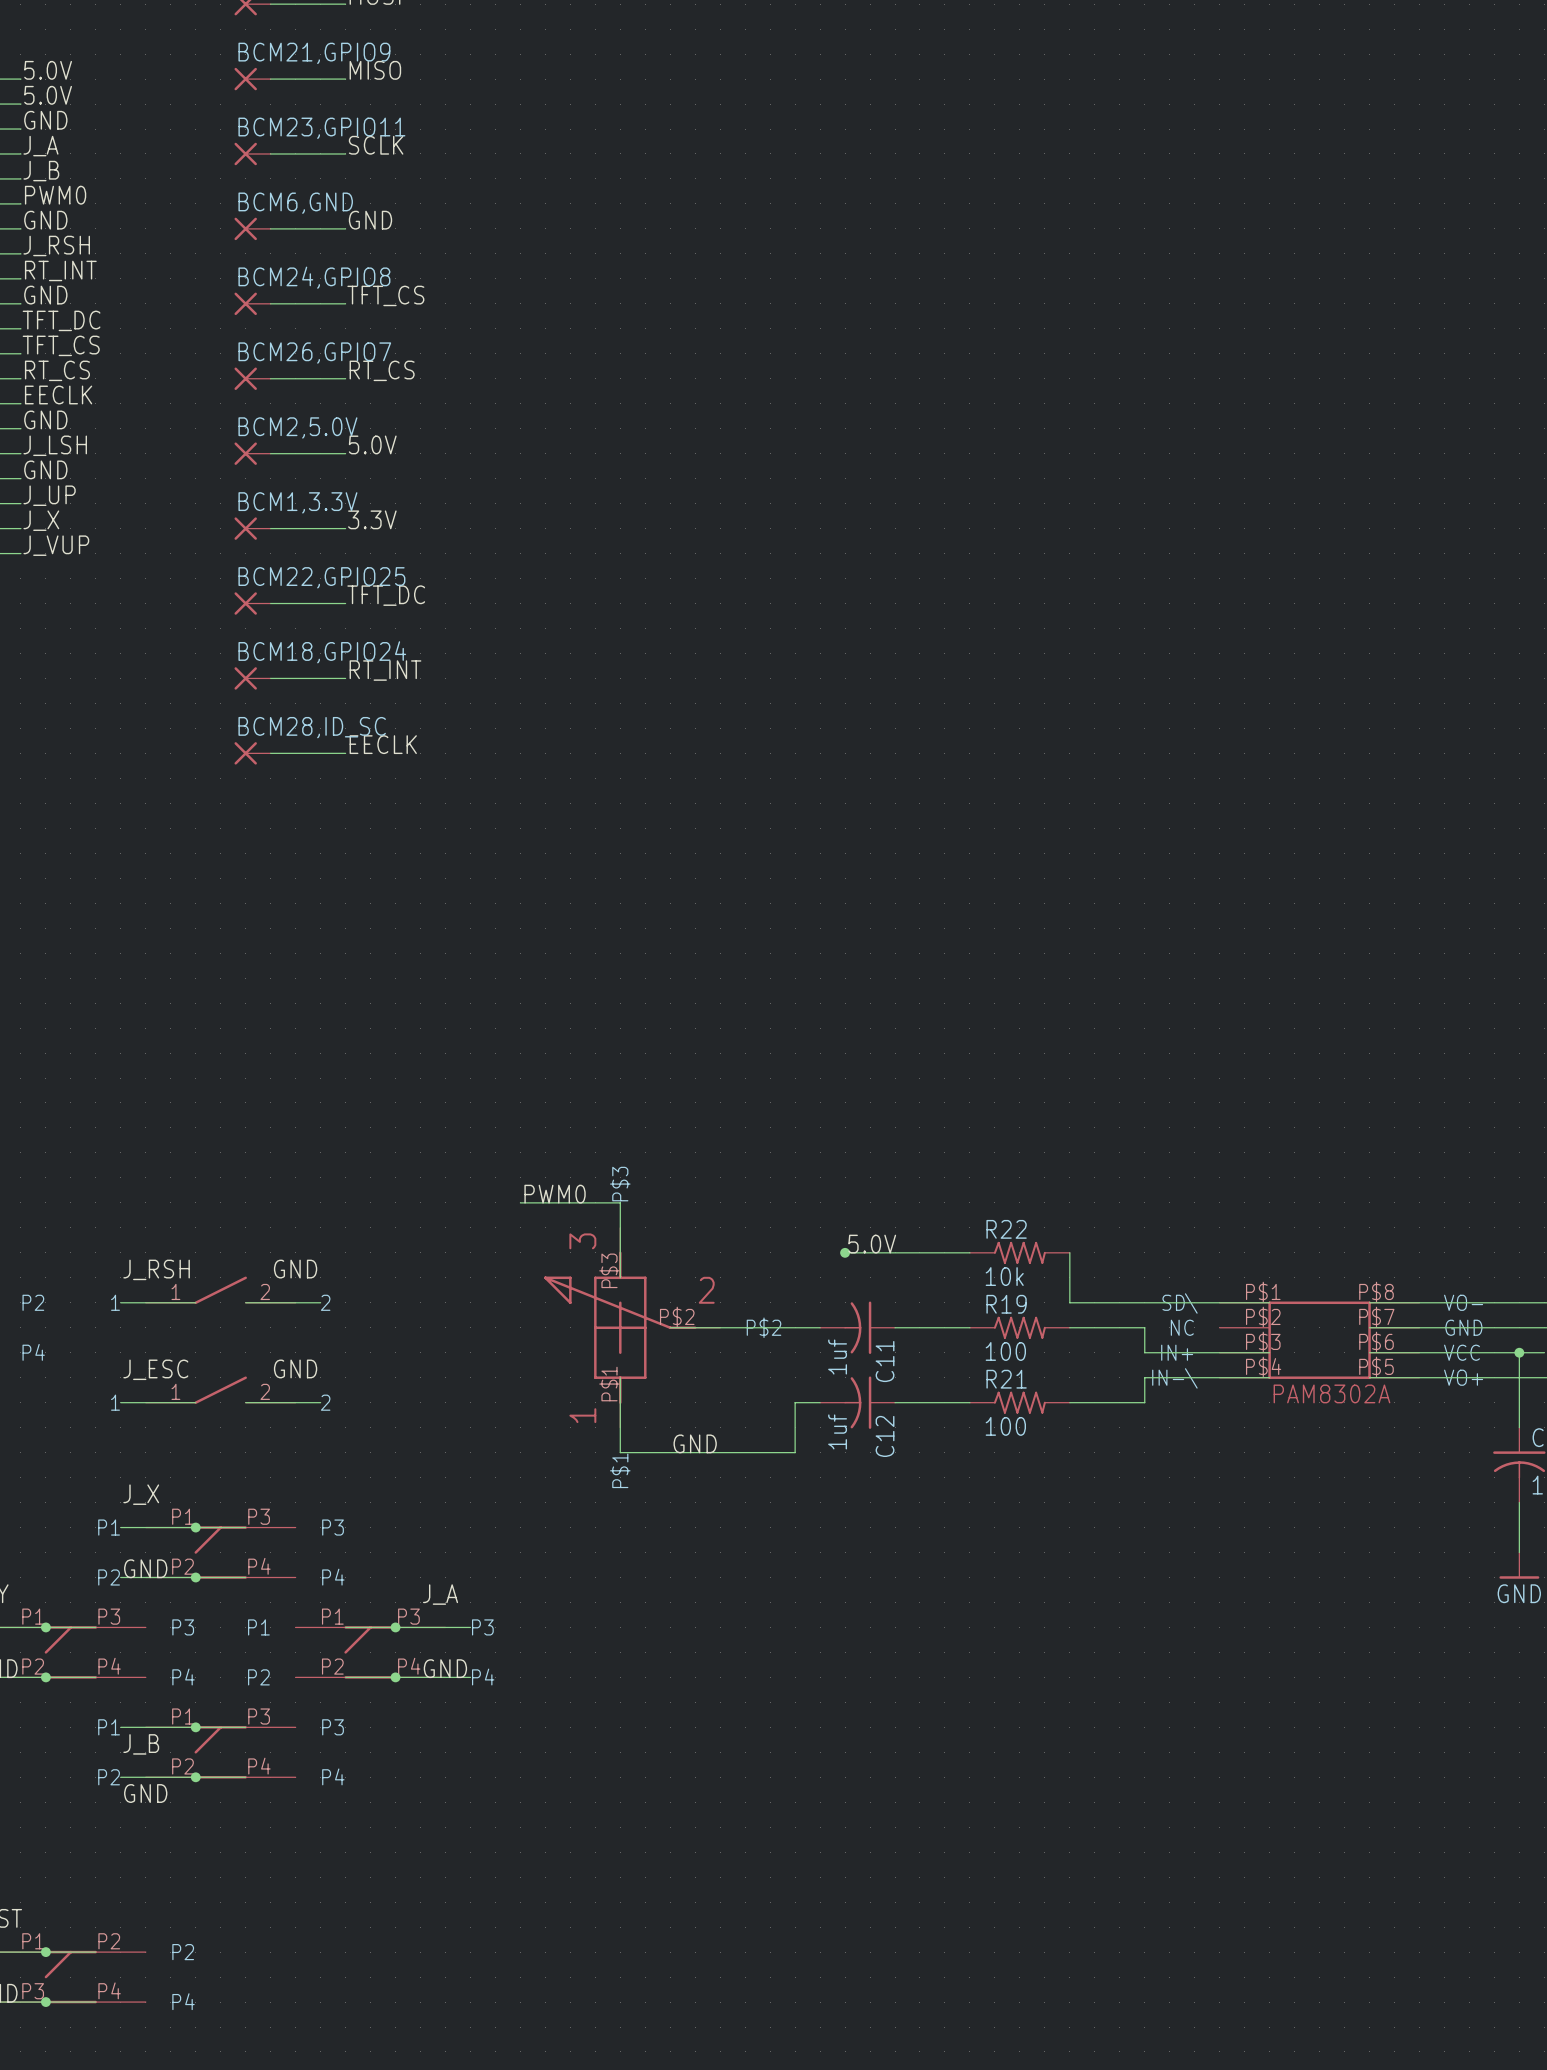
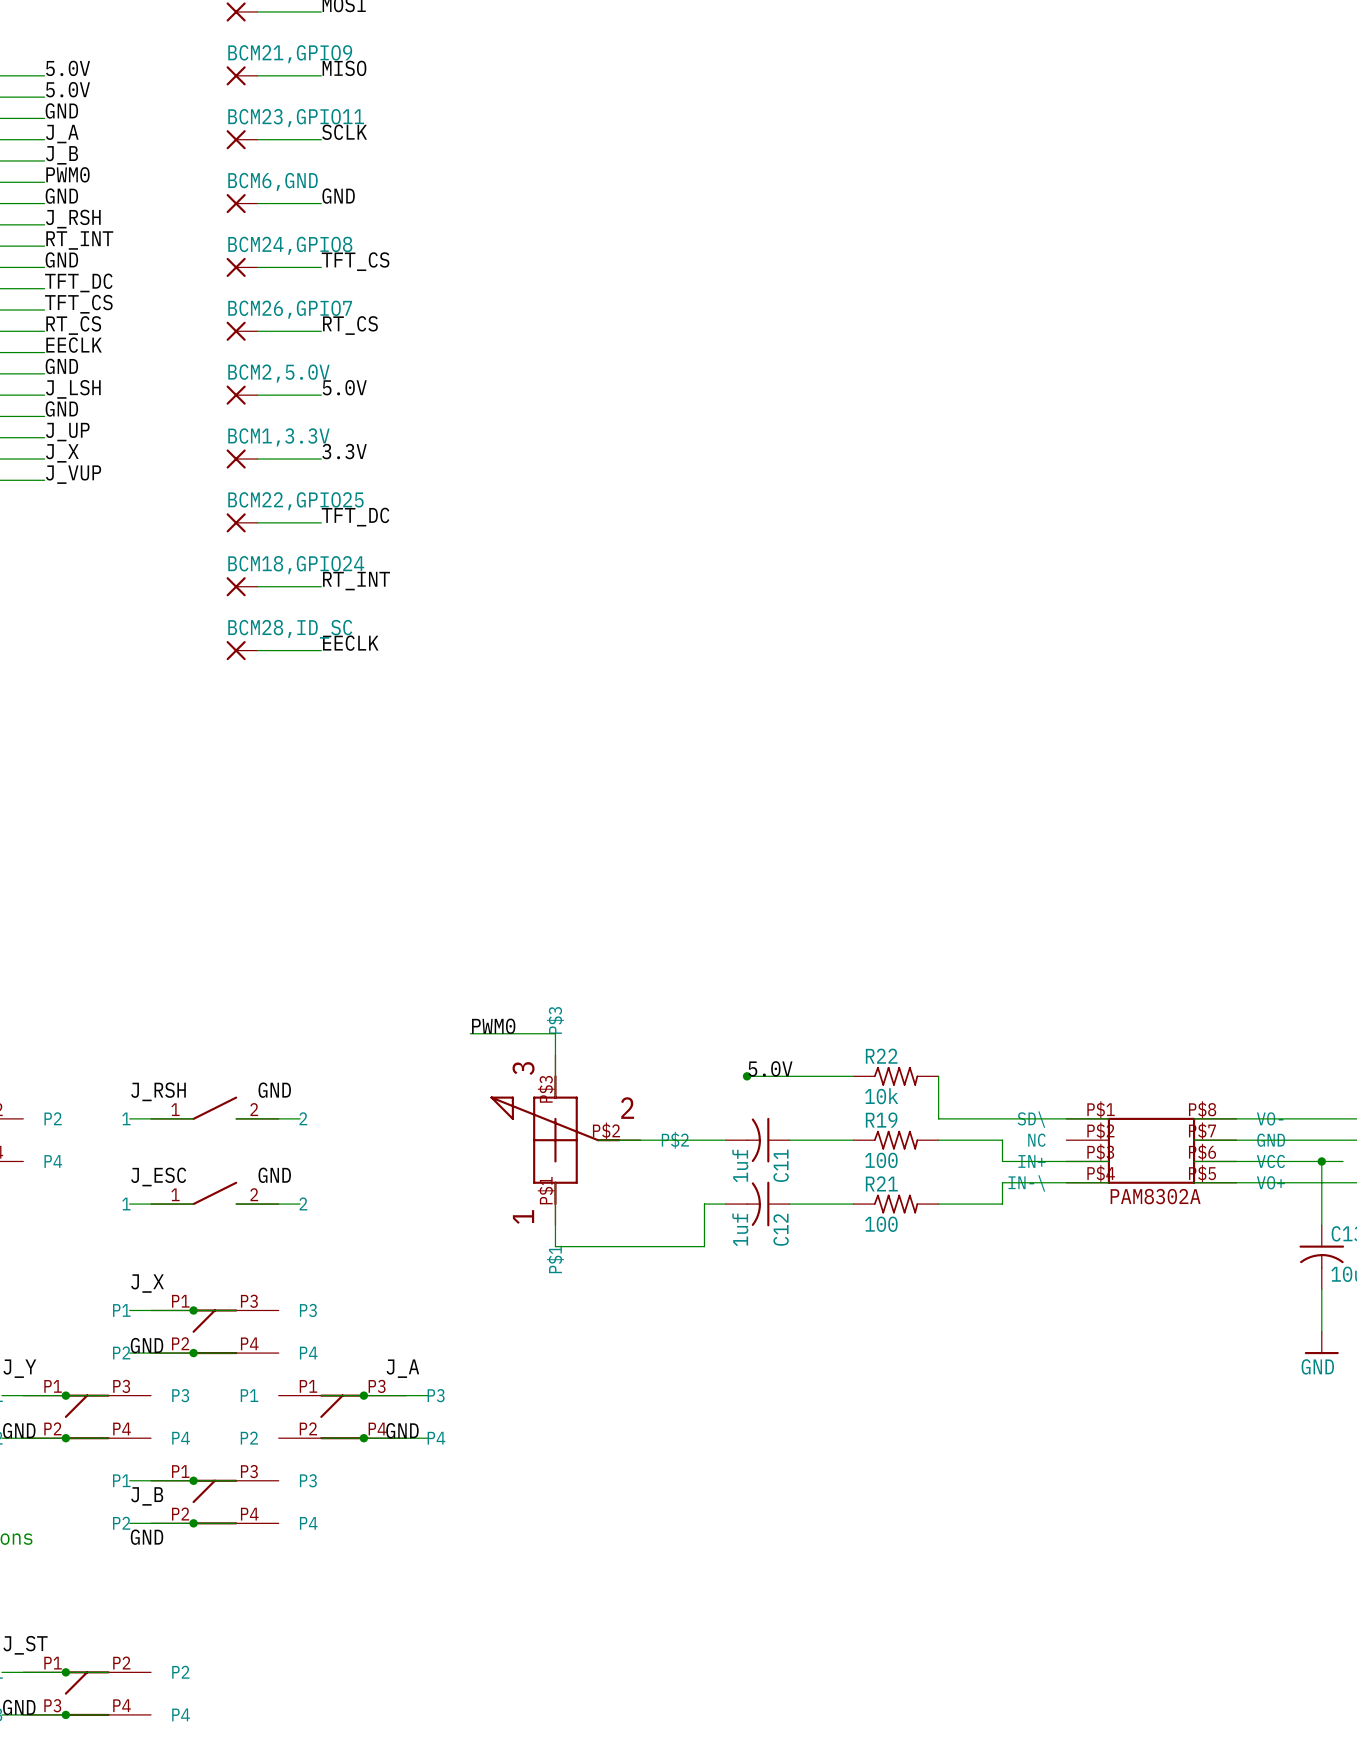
label: GND (695, 1443) -> none

